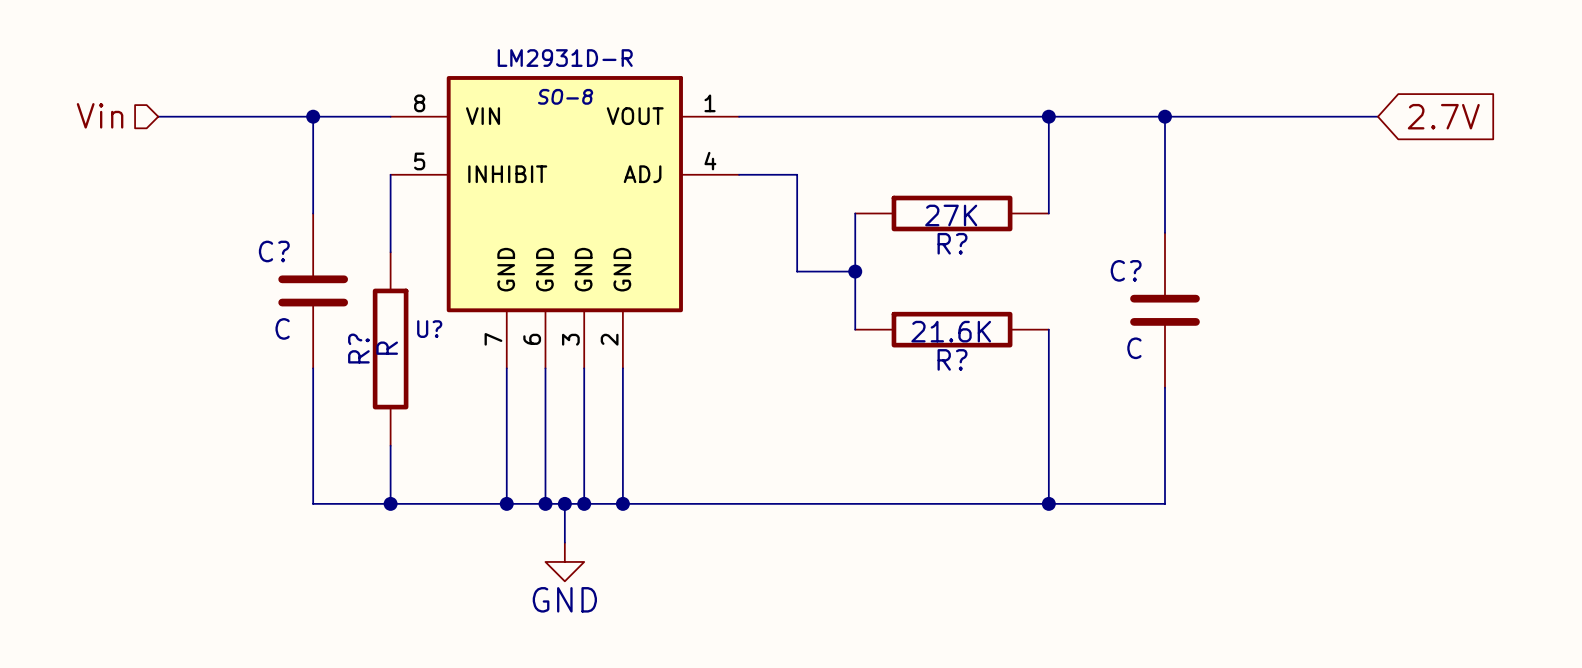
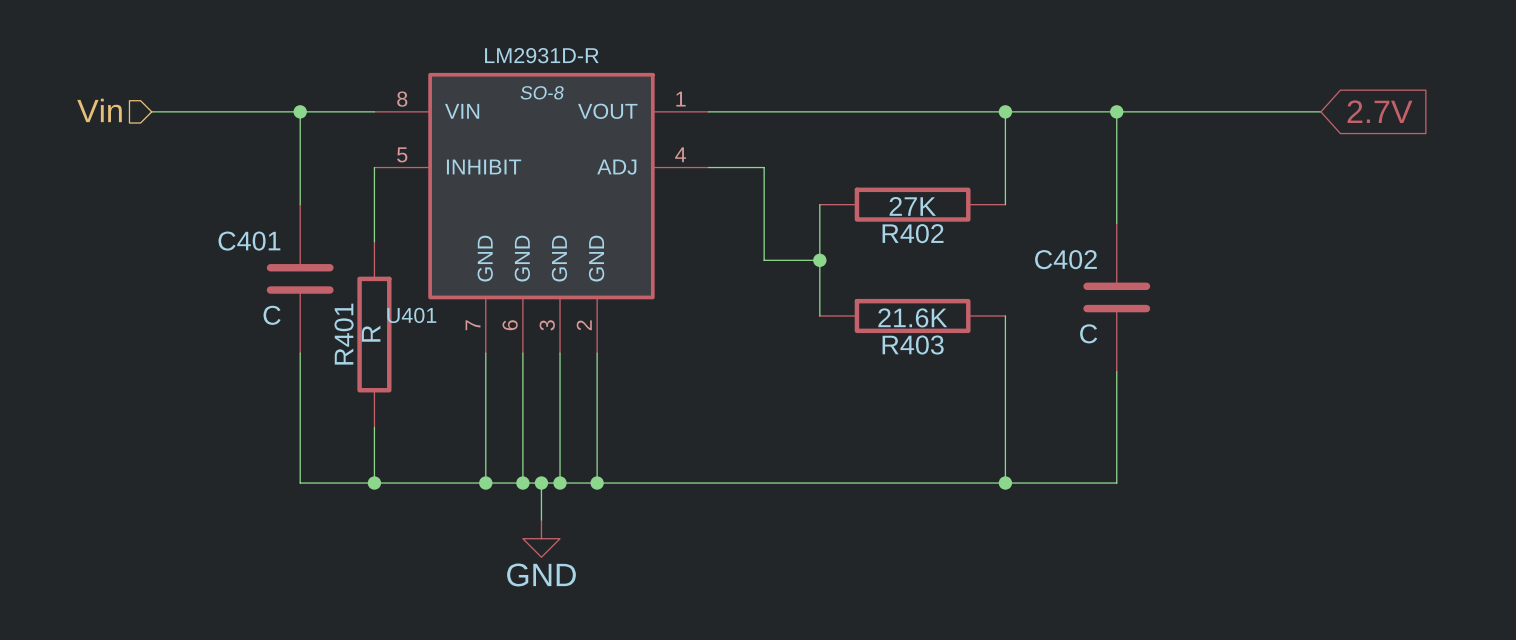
R? name: R? (952, 243) -> R402 (913, 233)
C? name: C? (274, 251) -> C401 (249, 241)
C? name: C? (1126, 270) -> C402 (1065, 259)
U? name: U? (429, 329) -> U401 (411, 315)
R? name: R? (358, 348) -> R401 (344, 334)
R? name: R? (952, 359) -> R403 (913, 344)

